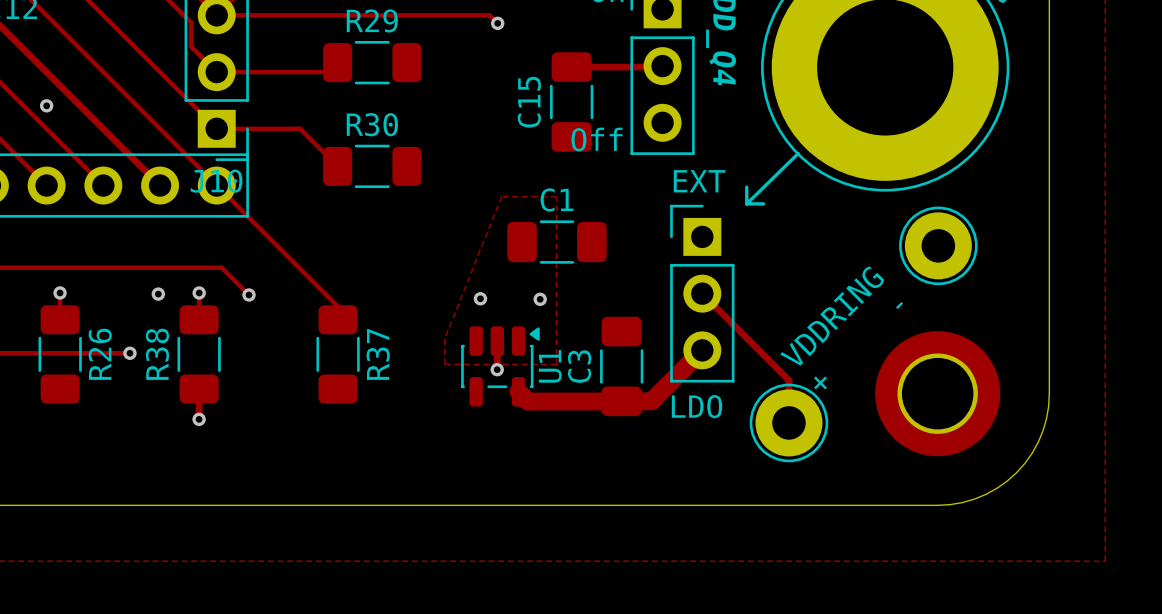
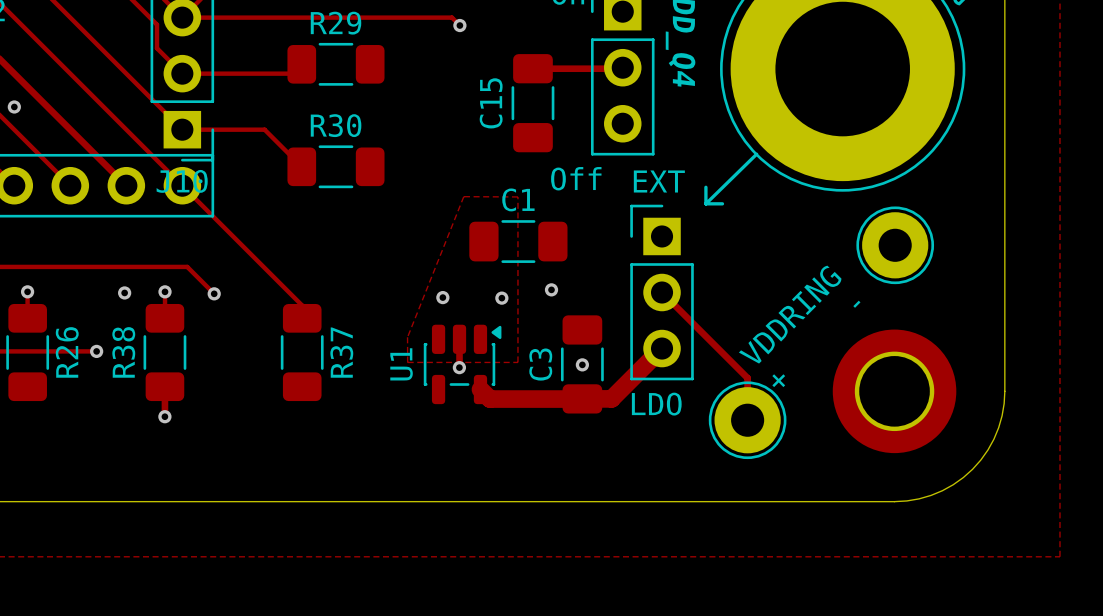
text position: Off (597, 139) -> Off (576, 178)
via: none -> (551, 289)
U1 name position: U1 (550, 366) -> U1 (401, 364)
via: none -> (582, 364)

